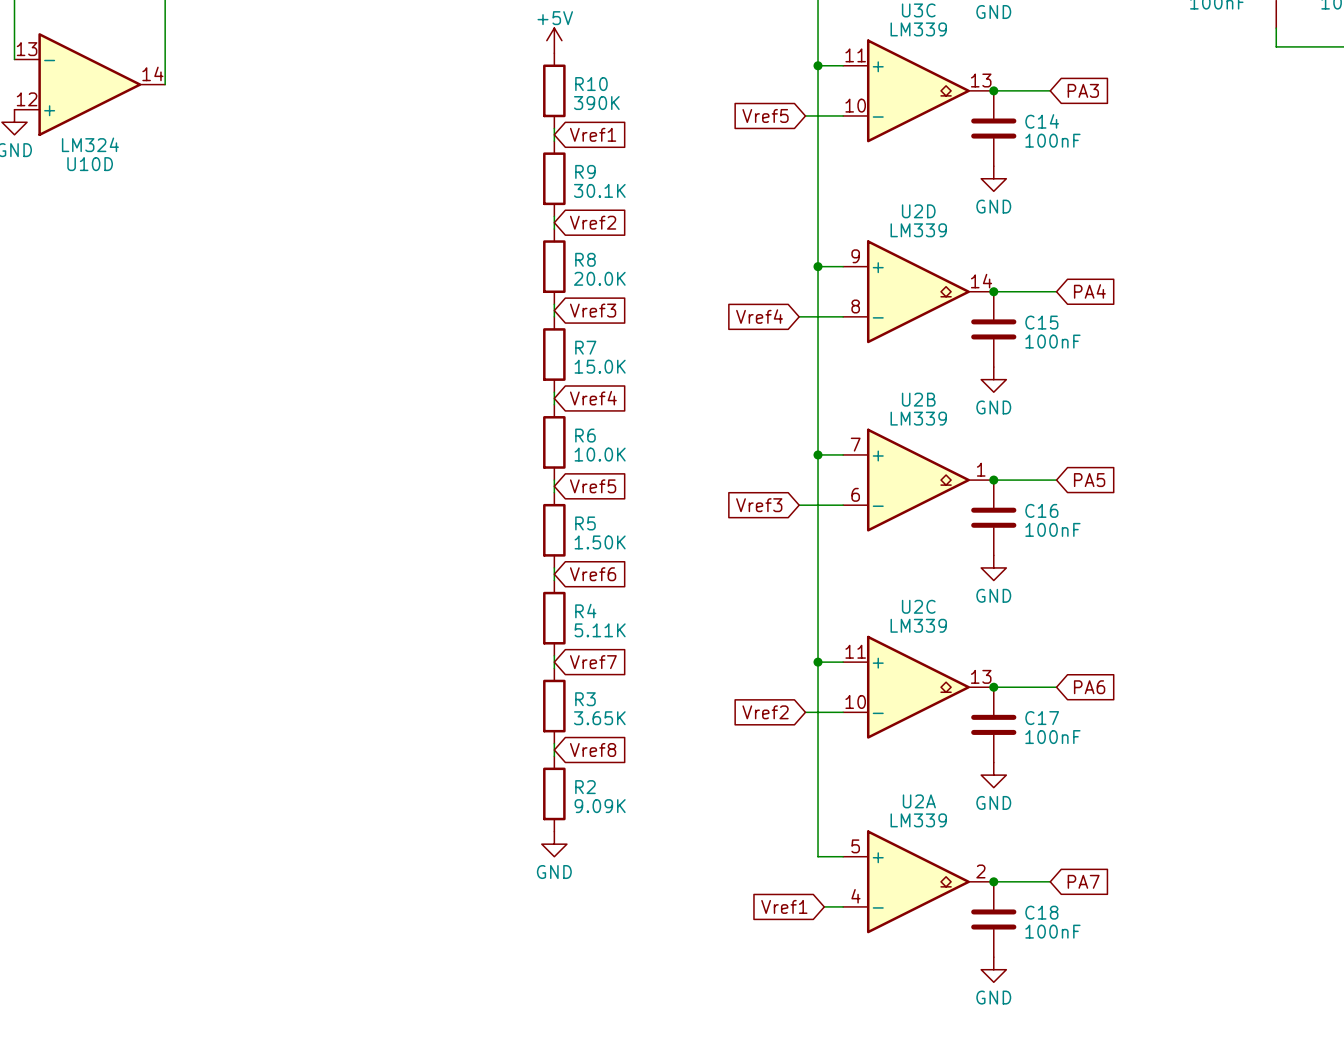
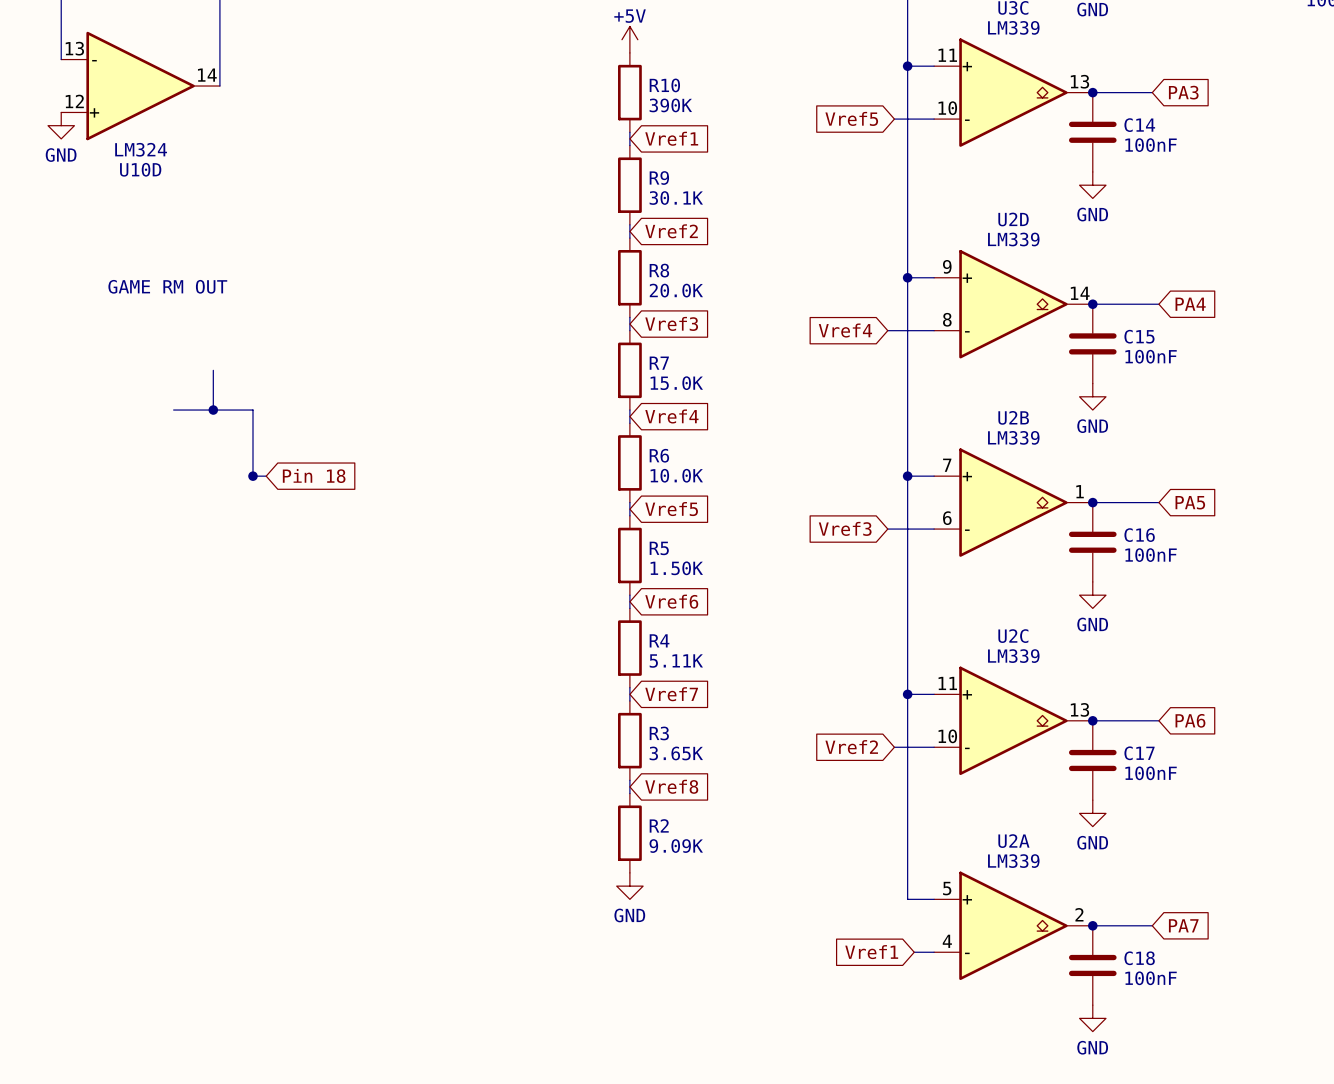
text: none -> GAME RM OUT (167, 286)
wire: none -> (213, 370) (213, 410)
wire: none -> (173, 410) (252, 410) (252, 476) (266, 476)
junction: none -> (213, 410)
junction: none -> (252, 476)
global label: none -> Pin 18 (314, 476)

